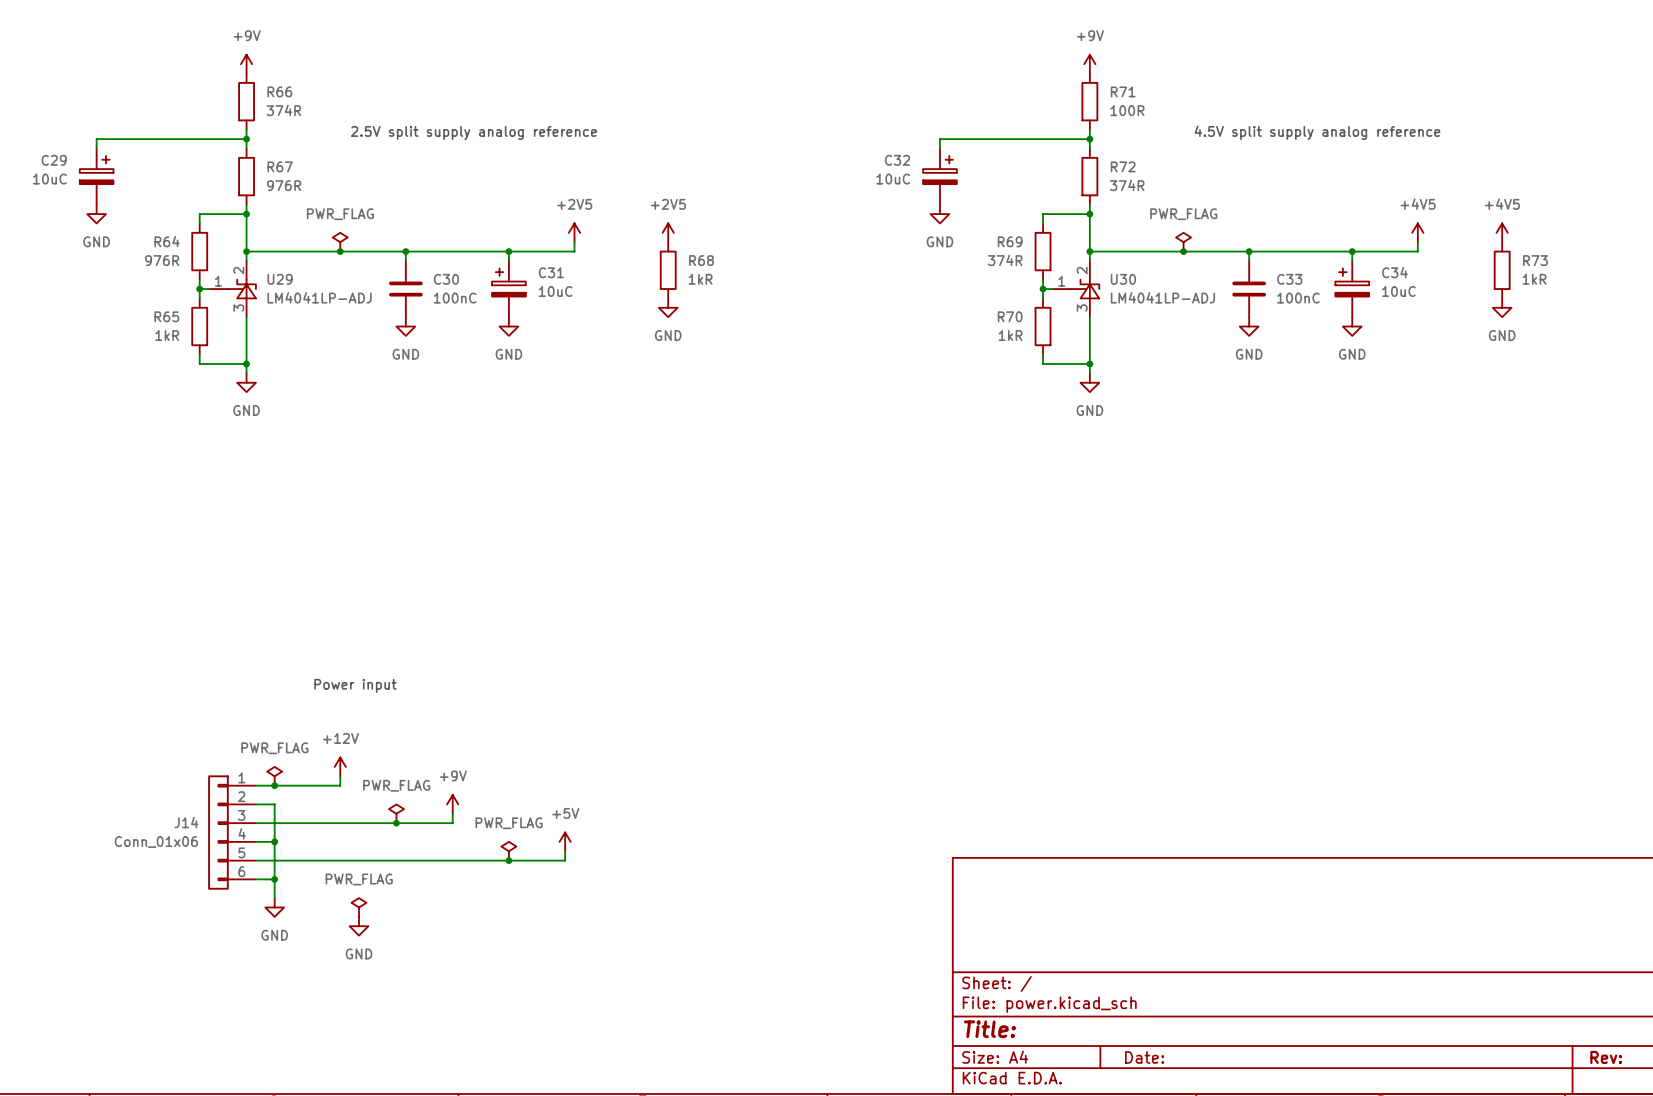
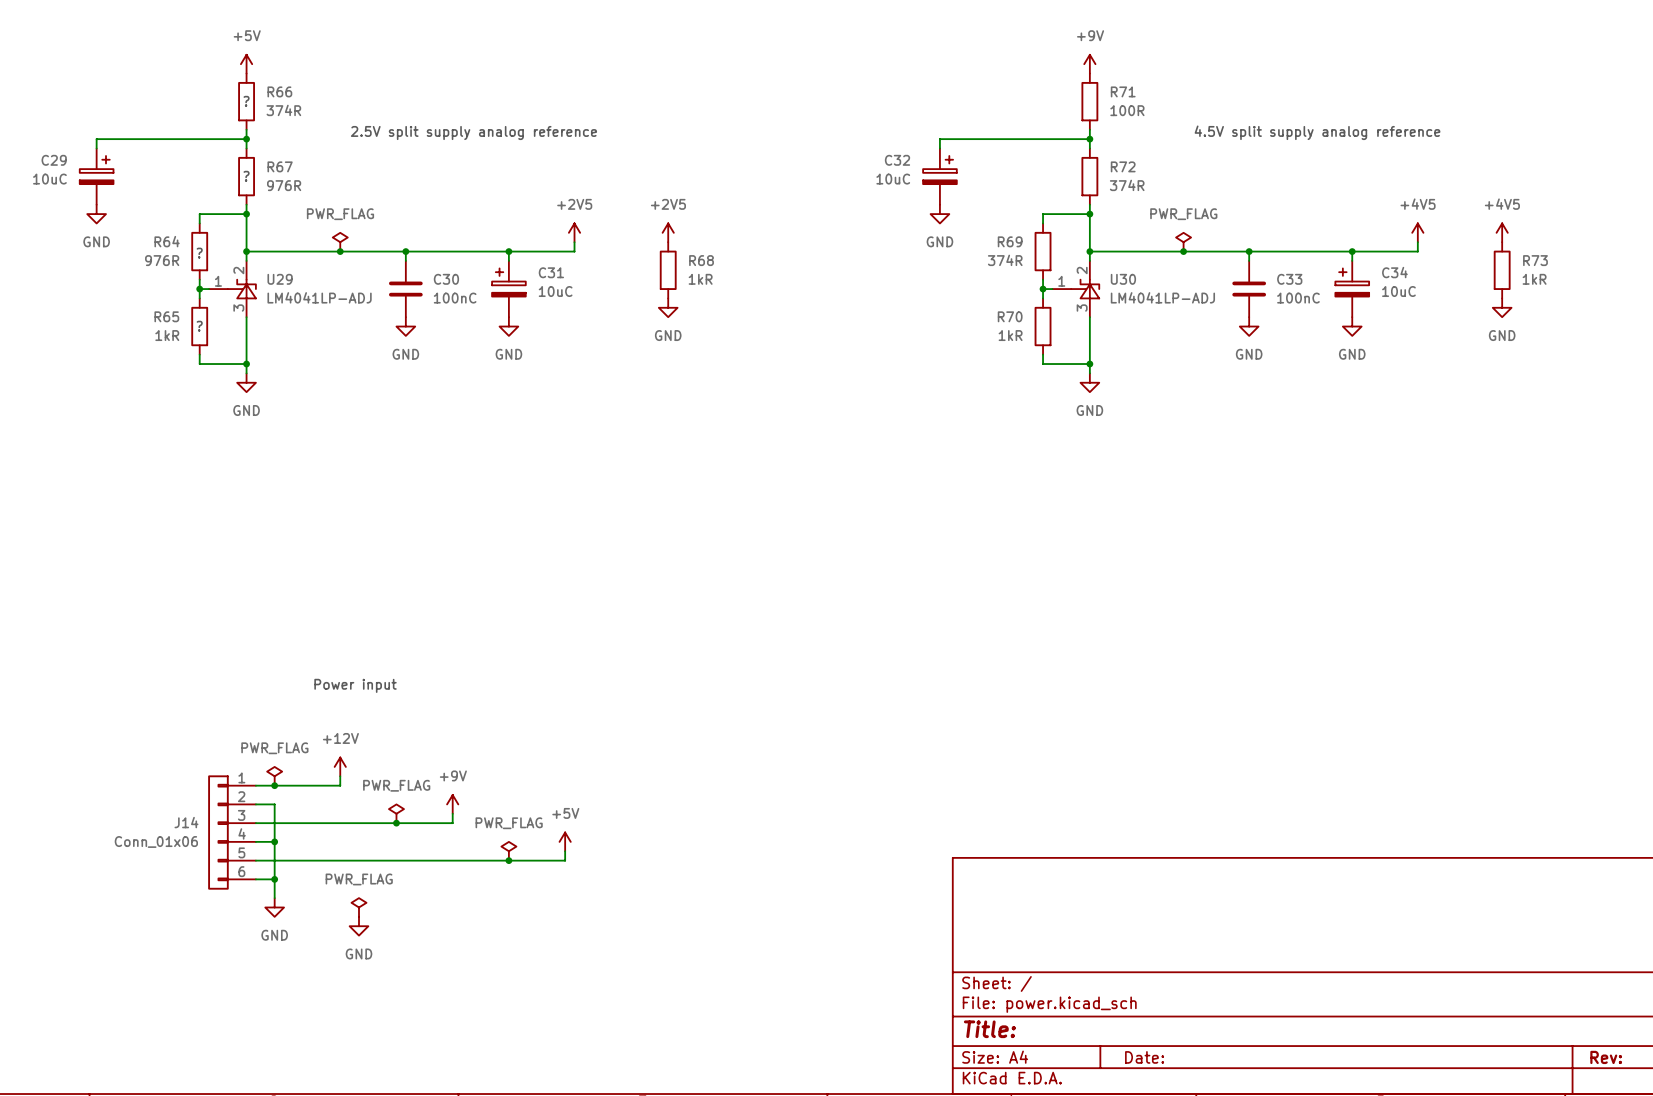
power symbol: +9V (246, 64) -> +5V (246, 64)
text: none -> ? (246, 101)
text: none -> ? (246, 176)
text: none -> ? (199, 253)
text: none -> ? (199, 326)

